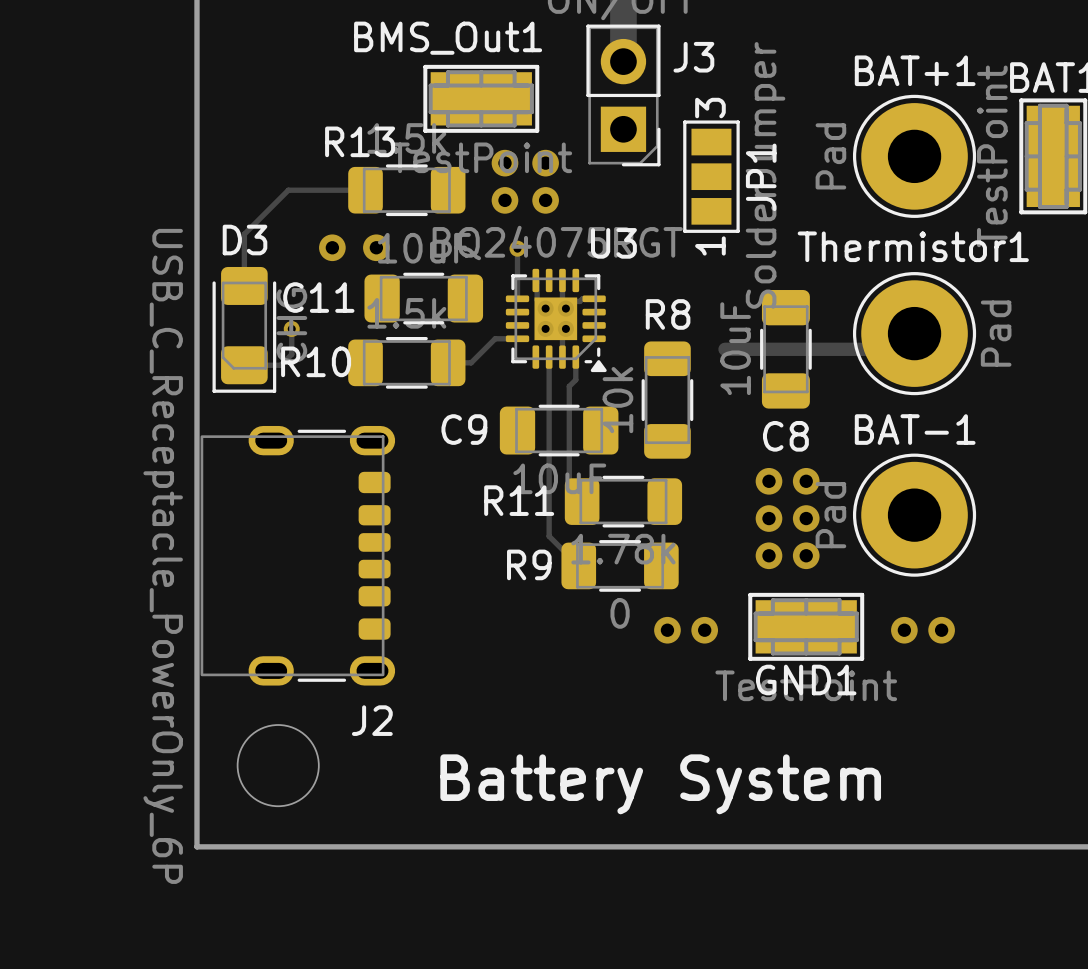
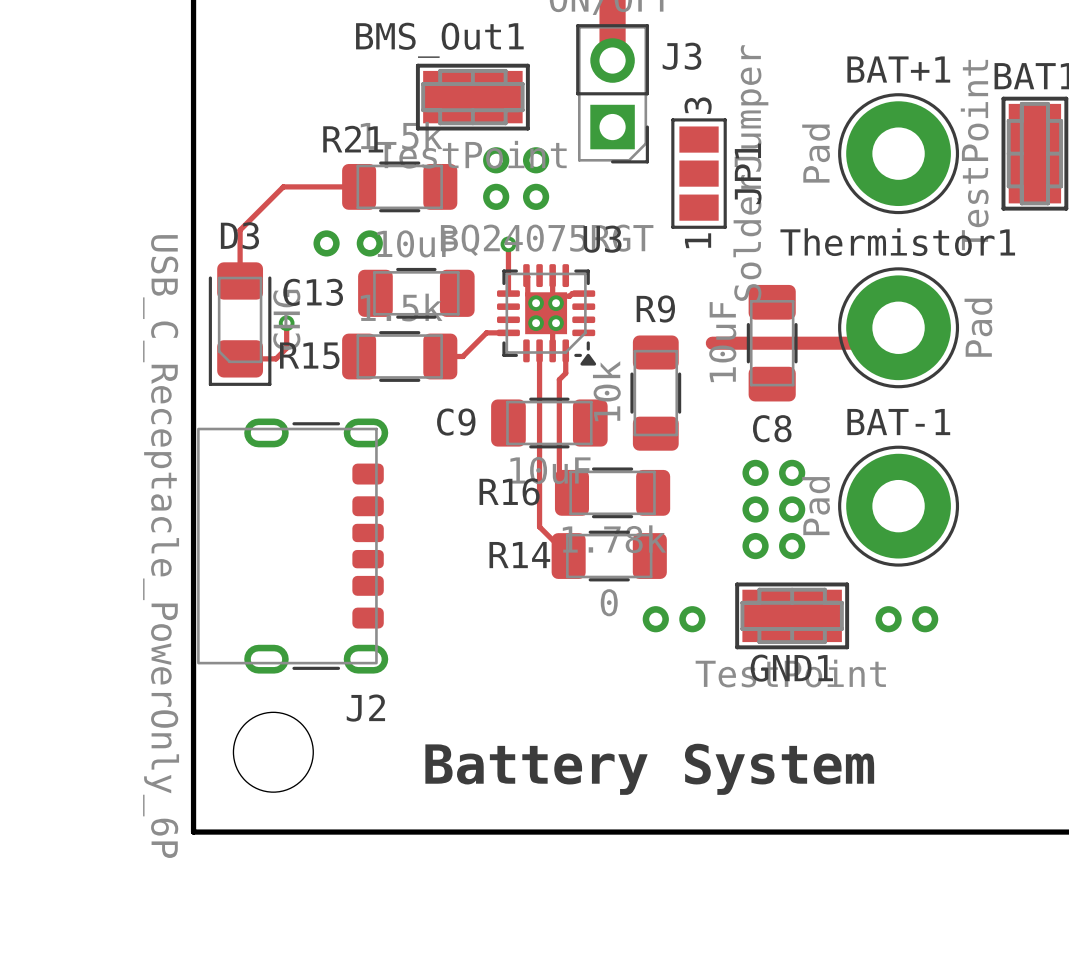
R13 name: R13 (360, 141) -> R21 (353, 139)
C11 name: C11 (318, 297) -> C13 (313, 292)
R8 name: R8 (668, 314) -> R9 (655, 308)
R10 name: R10 (316, 361) -> R15 (309, 355)
R11 name: R11 (519, 500) -> R16 (509, 491)
R9 name: R9 (529, 564) -> R14 (519, 555)

